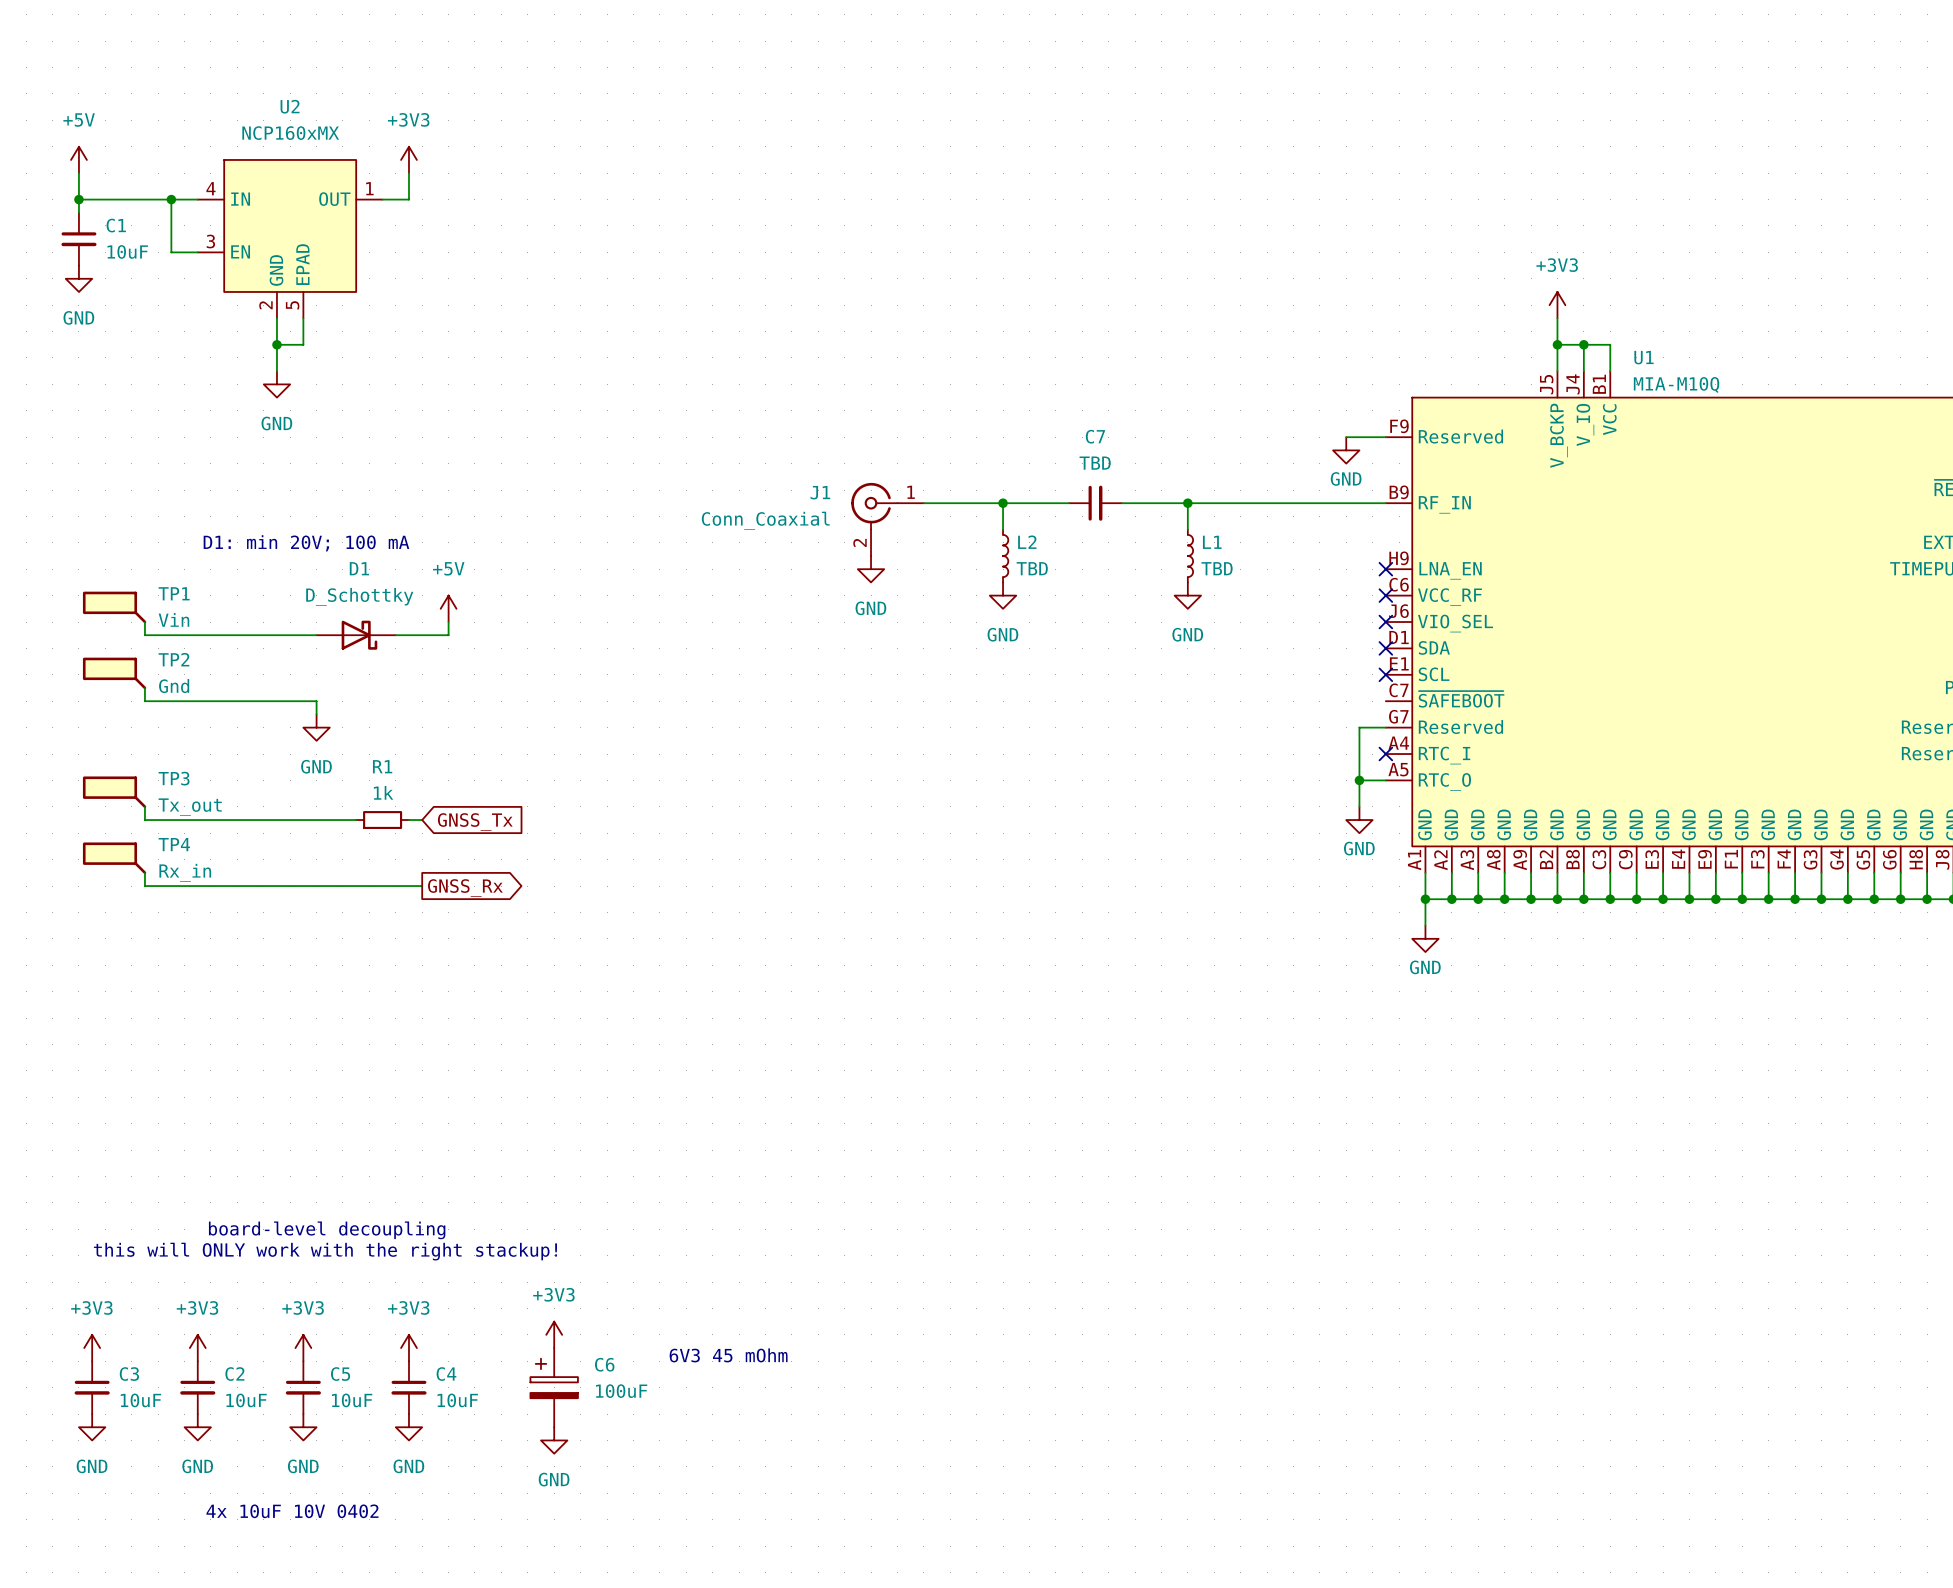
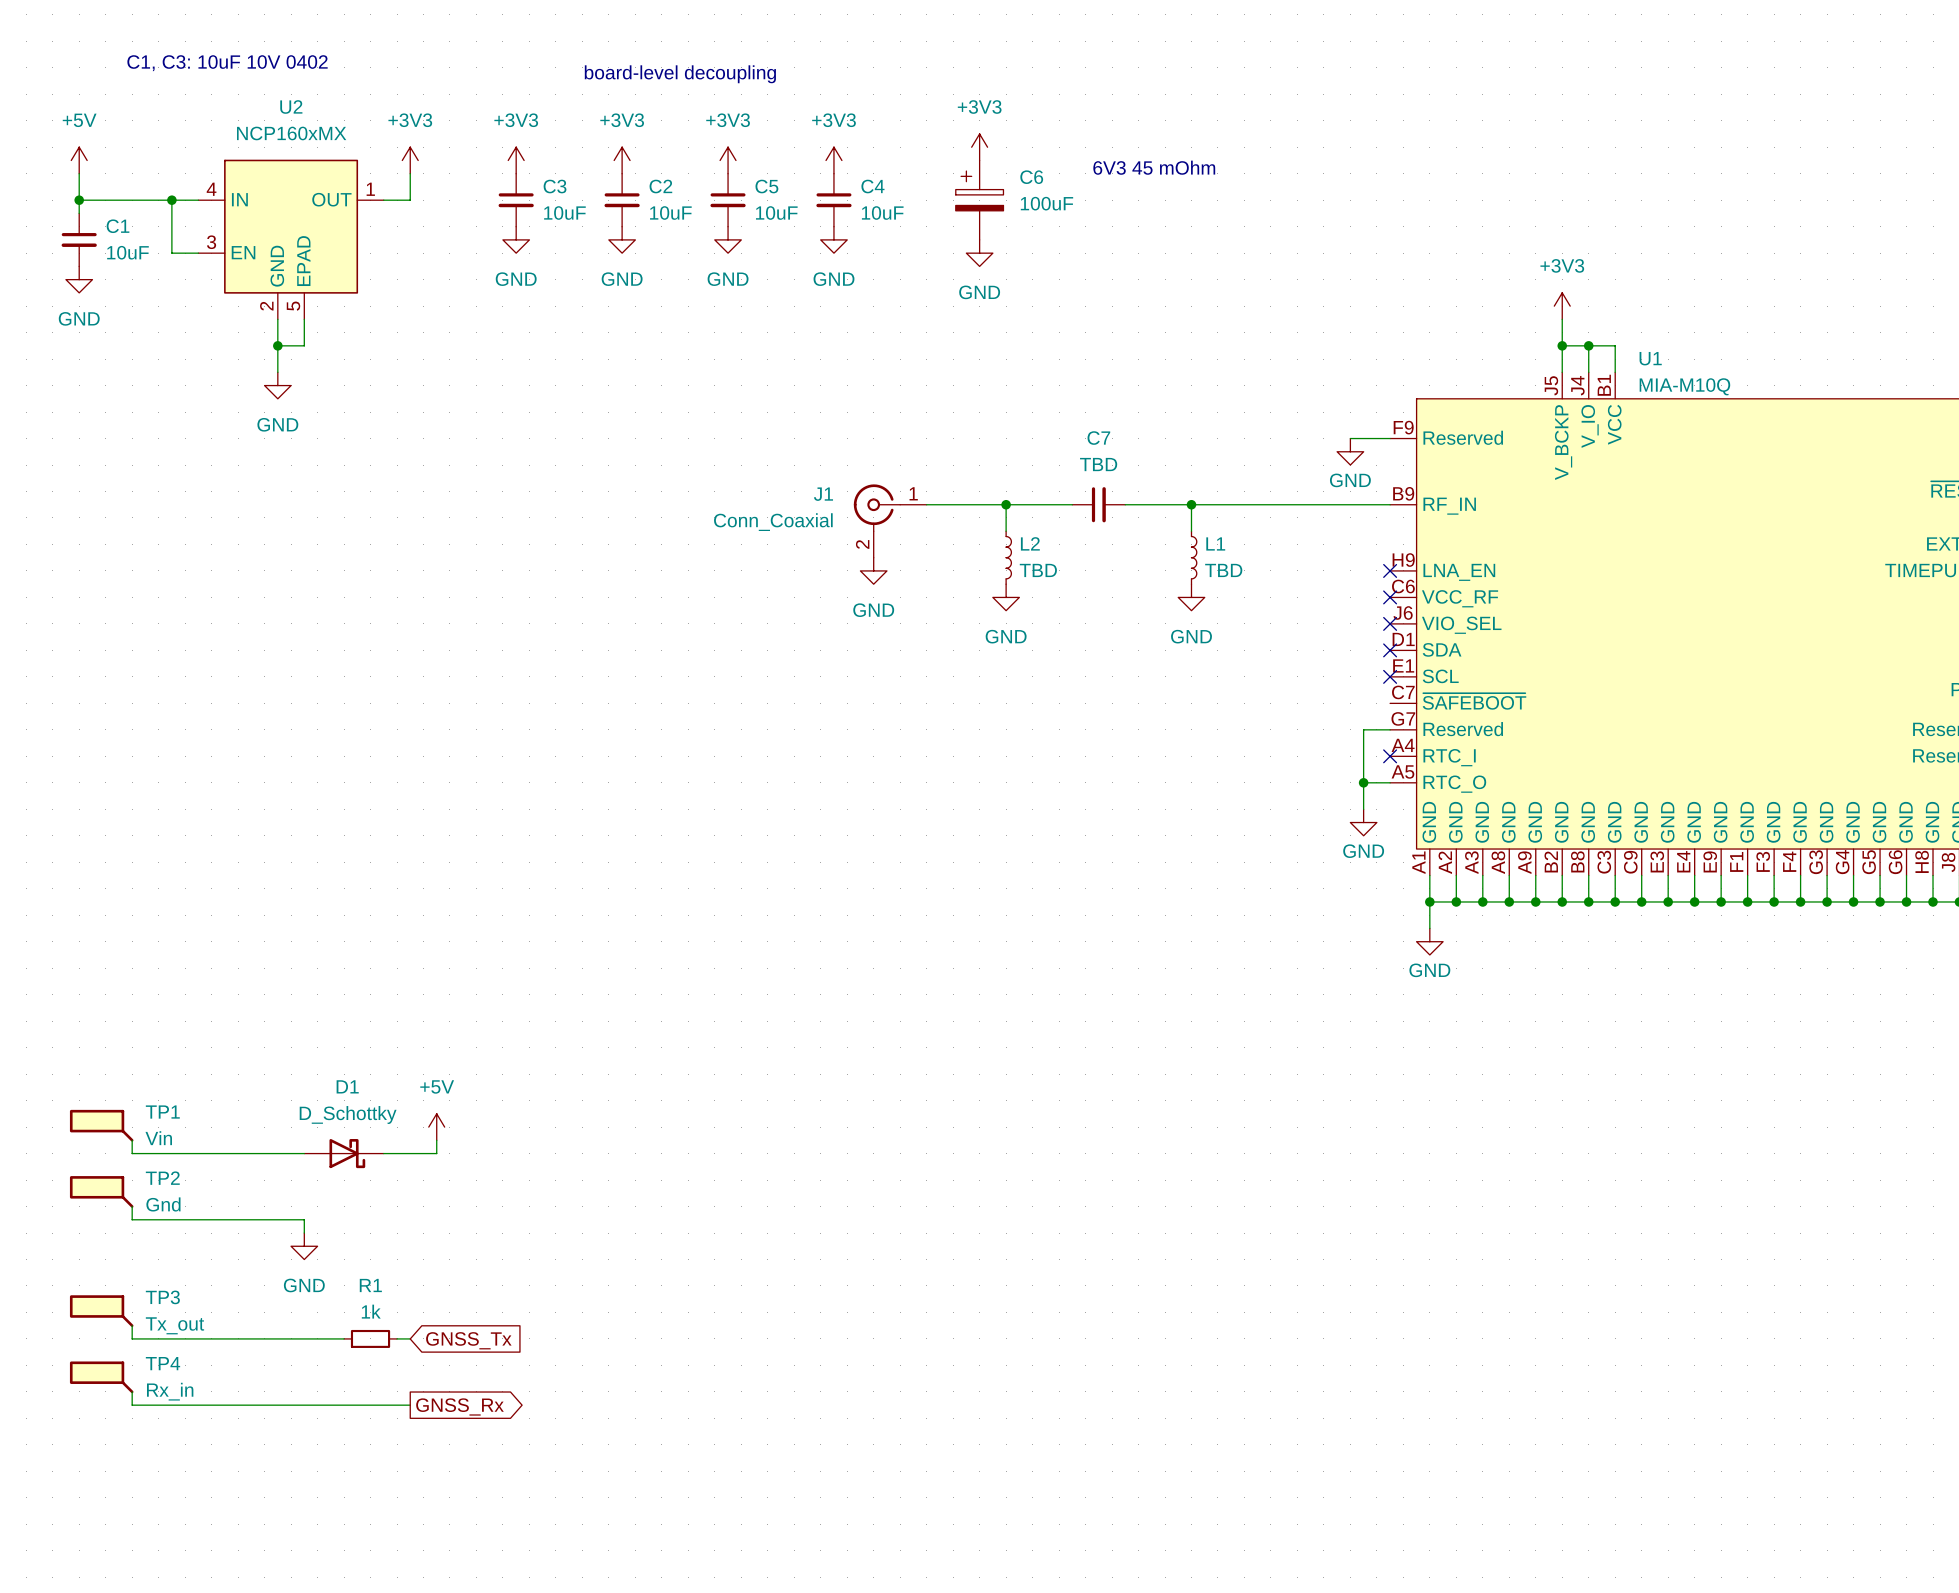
text: none -> C1, C3: 10uF 10V 0402 (227, 63)
text: none -> board-level decoupling (680, 74)
power symbol: none -> +3V3 (979, 147)
power symbol: none -> +3V3 (516, 160)
power symbol: none -> +3V3 (622, 160)
power symbol: none -> +3V3 (728, 160)
power symbol: none -> +3V3 (833, 160)
text: none -> 6V3 45 mOhm (1154, 167)
power symbol: none -> GND (516, 239)
power symbol: none -> GND (622, 239)
power symbol: none -> GND (728, 239)
power symbol: none -> GND (833, 239)
power symbol: none -> GND (979, 253)
text: D1: min 20V; 100 mA (306, 543) -> none
TP1 position: (114, 607) -> (101, 1125)
power symbol: +5V (448, 608) -> none
wire: (144, 622) (144, 635) (316, 635) -> none
wire: (448, 622) (448, 635) (395, 635) -> none
D1 position: (356, 635) -> (344, 1153)
TP2 position: (114, 673) -> (101, 1191)
wire: (144, 688) (144, 701) (316, 701) (316, 714) -> none
power symbol: GND (316, 727) -> none
TP3 position: (114, 792) -> (101, 1311)
wire: (144, 806) (144, 820) (356, 820) -> none
R1 position: (382, 820) -> (370, 1338)
wire: (408, 820) (422, 820) -> none
global label: GNSS_Tx (475, 822) -> none
TP4 position: (114, 858) -> (101, 1377)
wire: (144, 872) (144, 886) (422, 886) -> none
global label: GNSS_Rx (465, 888) -> none
power symbol: none -> +5V (436, 1127)
wire: none -> (132, 1140) (132, 1153) (304, 1153)
wire: none -> (436, 1140) (436, 1153) (383, 1153)
wire: none -> (132, 1206) (132, 1219) (304, 1219) (304, 1233)
text: board-level decoupling (327, 1230) -> none
power symbol: none -> GND (304, 1246)
text: this will ONLY work with the right stackup! (325, 1251) -> none
wire: none -> (132, 1325) (132, 1338) (344, 1338)
wire: none -> (397, 1338) (410, 1338)
power symbol: +3V3 (554, 1334) -> none
global label: none -> GNSS_Tx (468, 1340)
power symbol: +3V3 (92, 1348) -> none
power symbol: +3V3 (197, 1348) -> none
power symbol: +3V3 (303, 1348) -> none
power symbol: +3V3 (408, 1348) -> none
text: 6V3 45 mOhm (728, 1355) -> none
C3 position: (92, 1387) -> (516, 200)
wire: none -> (132, 1391) (132, 1405) (410, 1405)
C2 position: (197, 1387) -> (622, 200)
C5 position: (303, 1387) -> (728, 200)
C4 position: (408, 1387) -> (833, 200)
C6 position: (554, 1387) -> (979, 200)
global label: none -> GNSS_Rx (459, 1406)
power symbol: GND (92, 1427) -> none
power symbol: GND (197, 1427) -> none
power symbol: GND (303, 1427) -> none
power symbol: GND (408, 1427) -> none
power symbol: GND (554, 1440) -> none
text: 4x 10uF 10V 0402 (292, 1511) -> none

